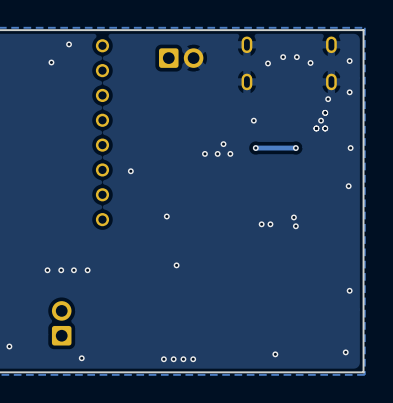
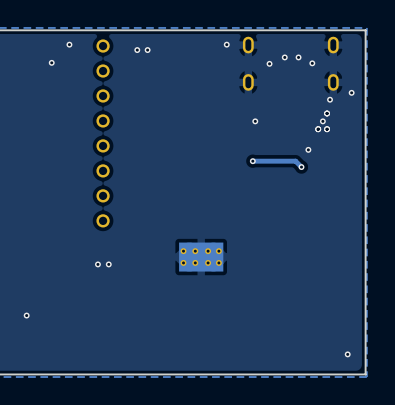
via: none -> (226, 44)
via: none -> (137, 50)
via: none -> (147, 50)
part: (181, 58) -> none
via: (349, 61) -> none
via: (223, 144) -> none
via: (255, 148) -> none
track: (295, 148) (255, 148) -> none
via: (295, 148) -> none
via: (350, 148) -> none
via: none -> (308, 149)
via: (204, 153) -> none
via: (217, 153) -> none
via: (230, 153) -> none
track: none -> (252, 161) (295, 161) (301, 167)
via: none -> (252, 161)
via: none -> (301, 167)
via: (130, 171) -> none
via: (348, 186) -> none
via: (166, 216) -> none
via: (293, 217) -> none
via: (261, 224) -> none
via: (270, 224) -> none
via: (295, 226) -> none
part: none -> (201, 257)
via: none -> (97, 264)
via: none -> (108, 264)
via: (176, 265) -> none
via: (47, 270) -> none
via: (61, 270) -> none
via: (73, 270) -> none
via: (87, 270) -> none
via: (349, 290) -> none
via: none -> (26, 315)
part: (61, 323) -> none
via: (9, 346) -> none
via: (275, 354) -> none
via: (81, 358) -> none
via: (163, 359) -> none
via: (173, 359) -> none
via: (183, 359) -> none
via: (193, 359) -> none

